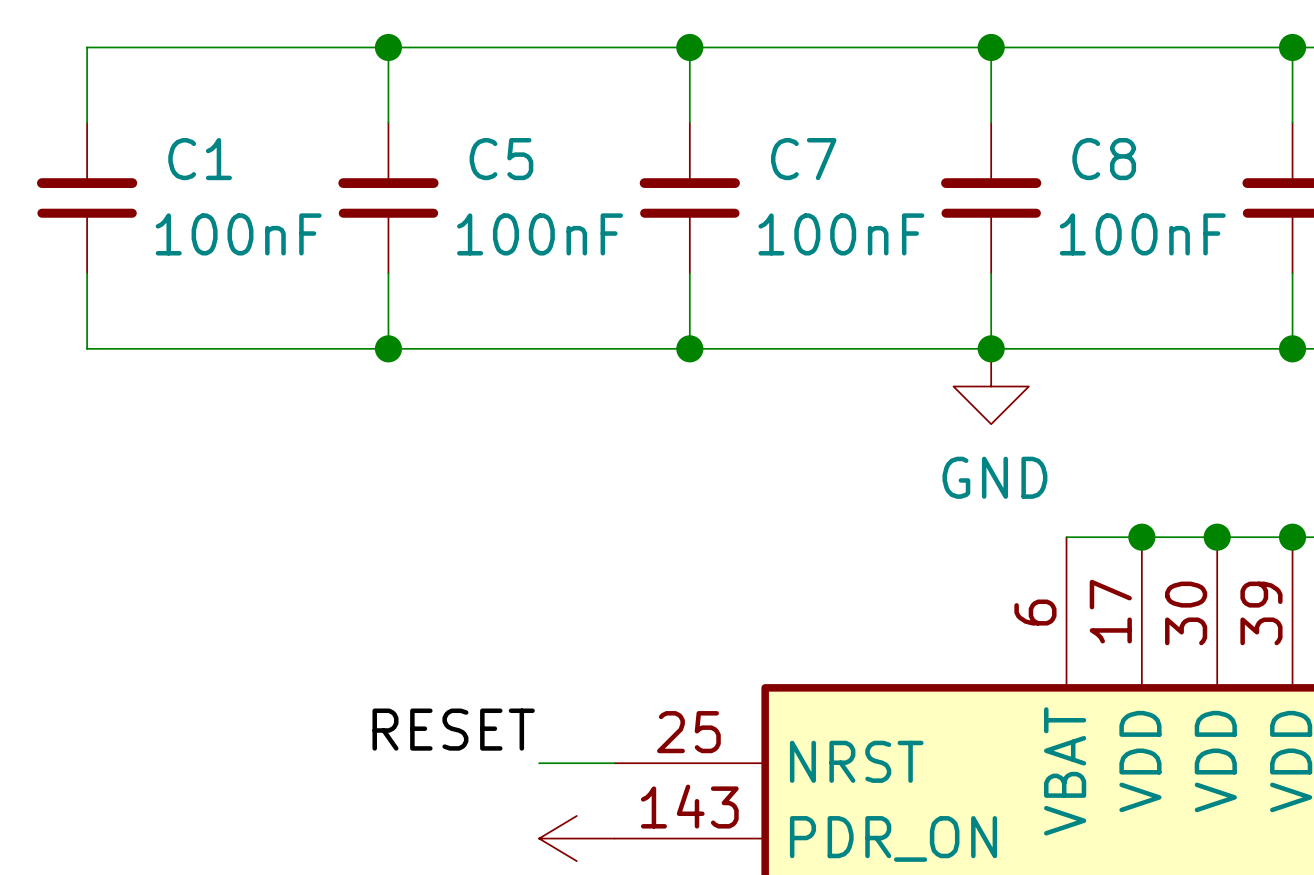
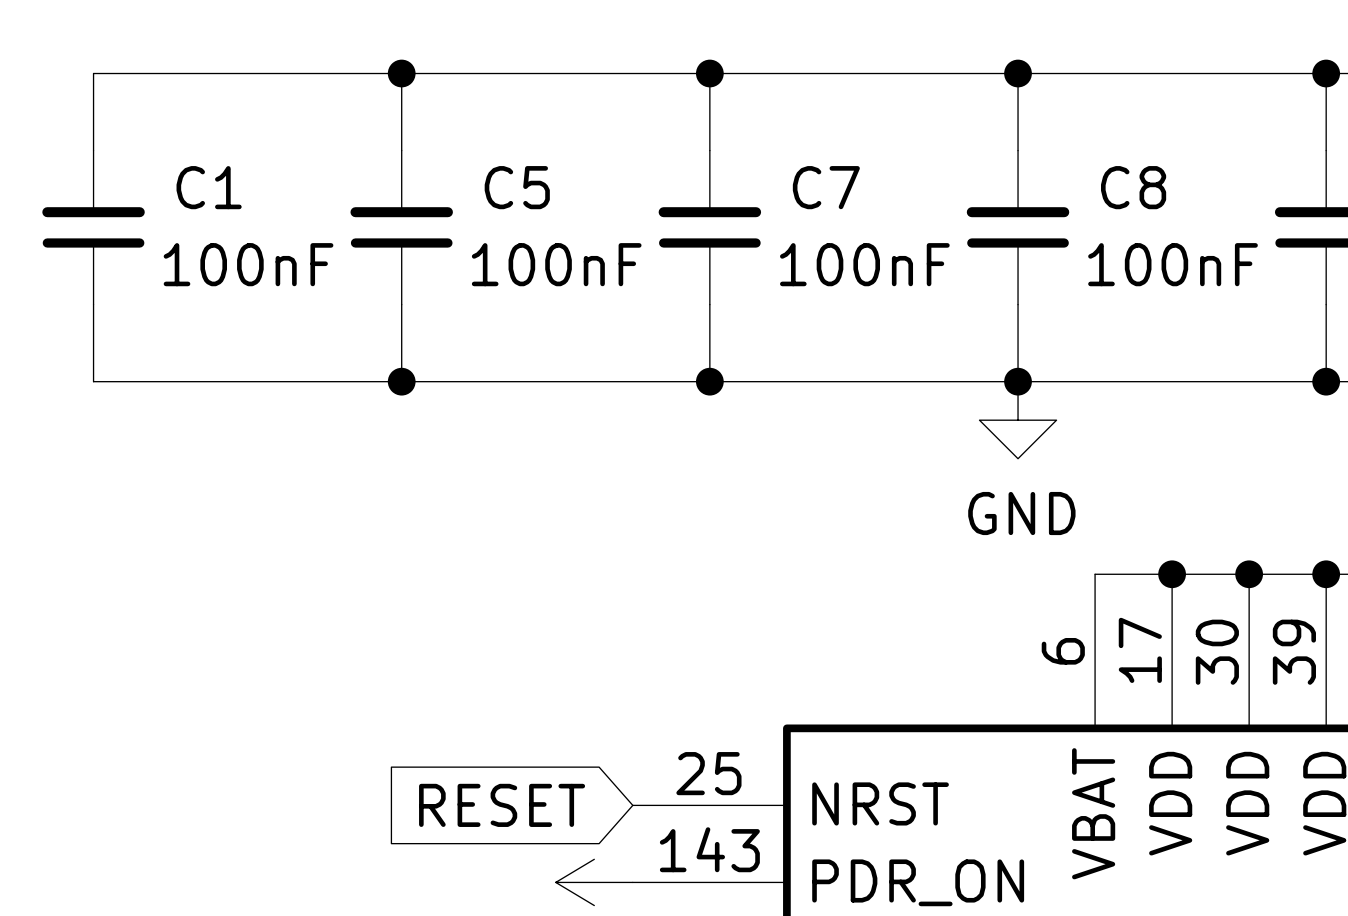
label: RESET (453, 729) -> none
global label: none -> RESET (502, 805)
wire: (539, 763) (614, 763) -> none

